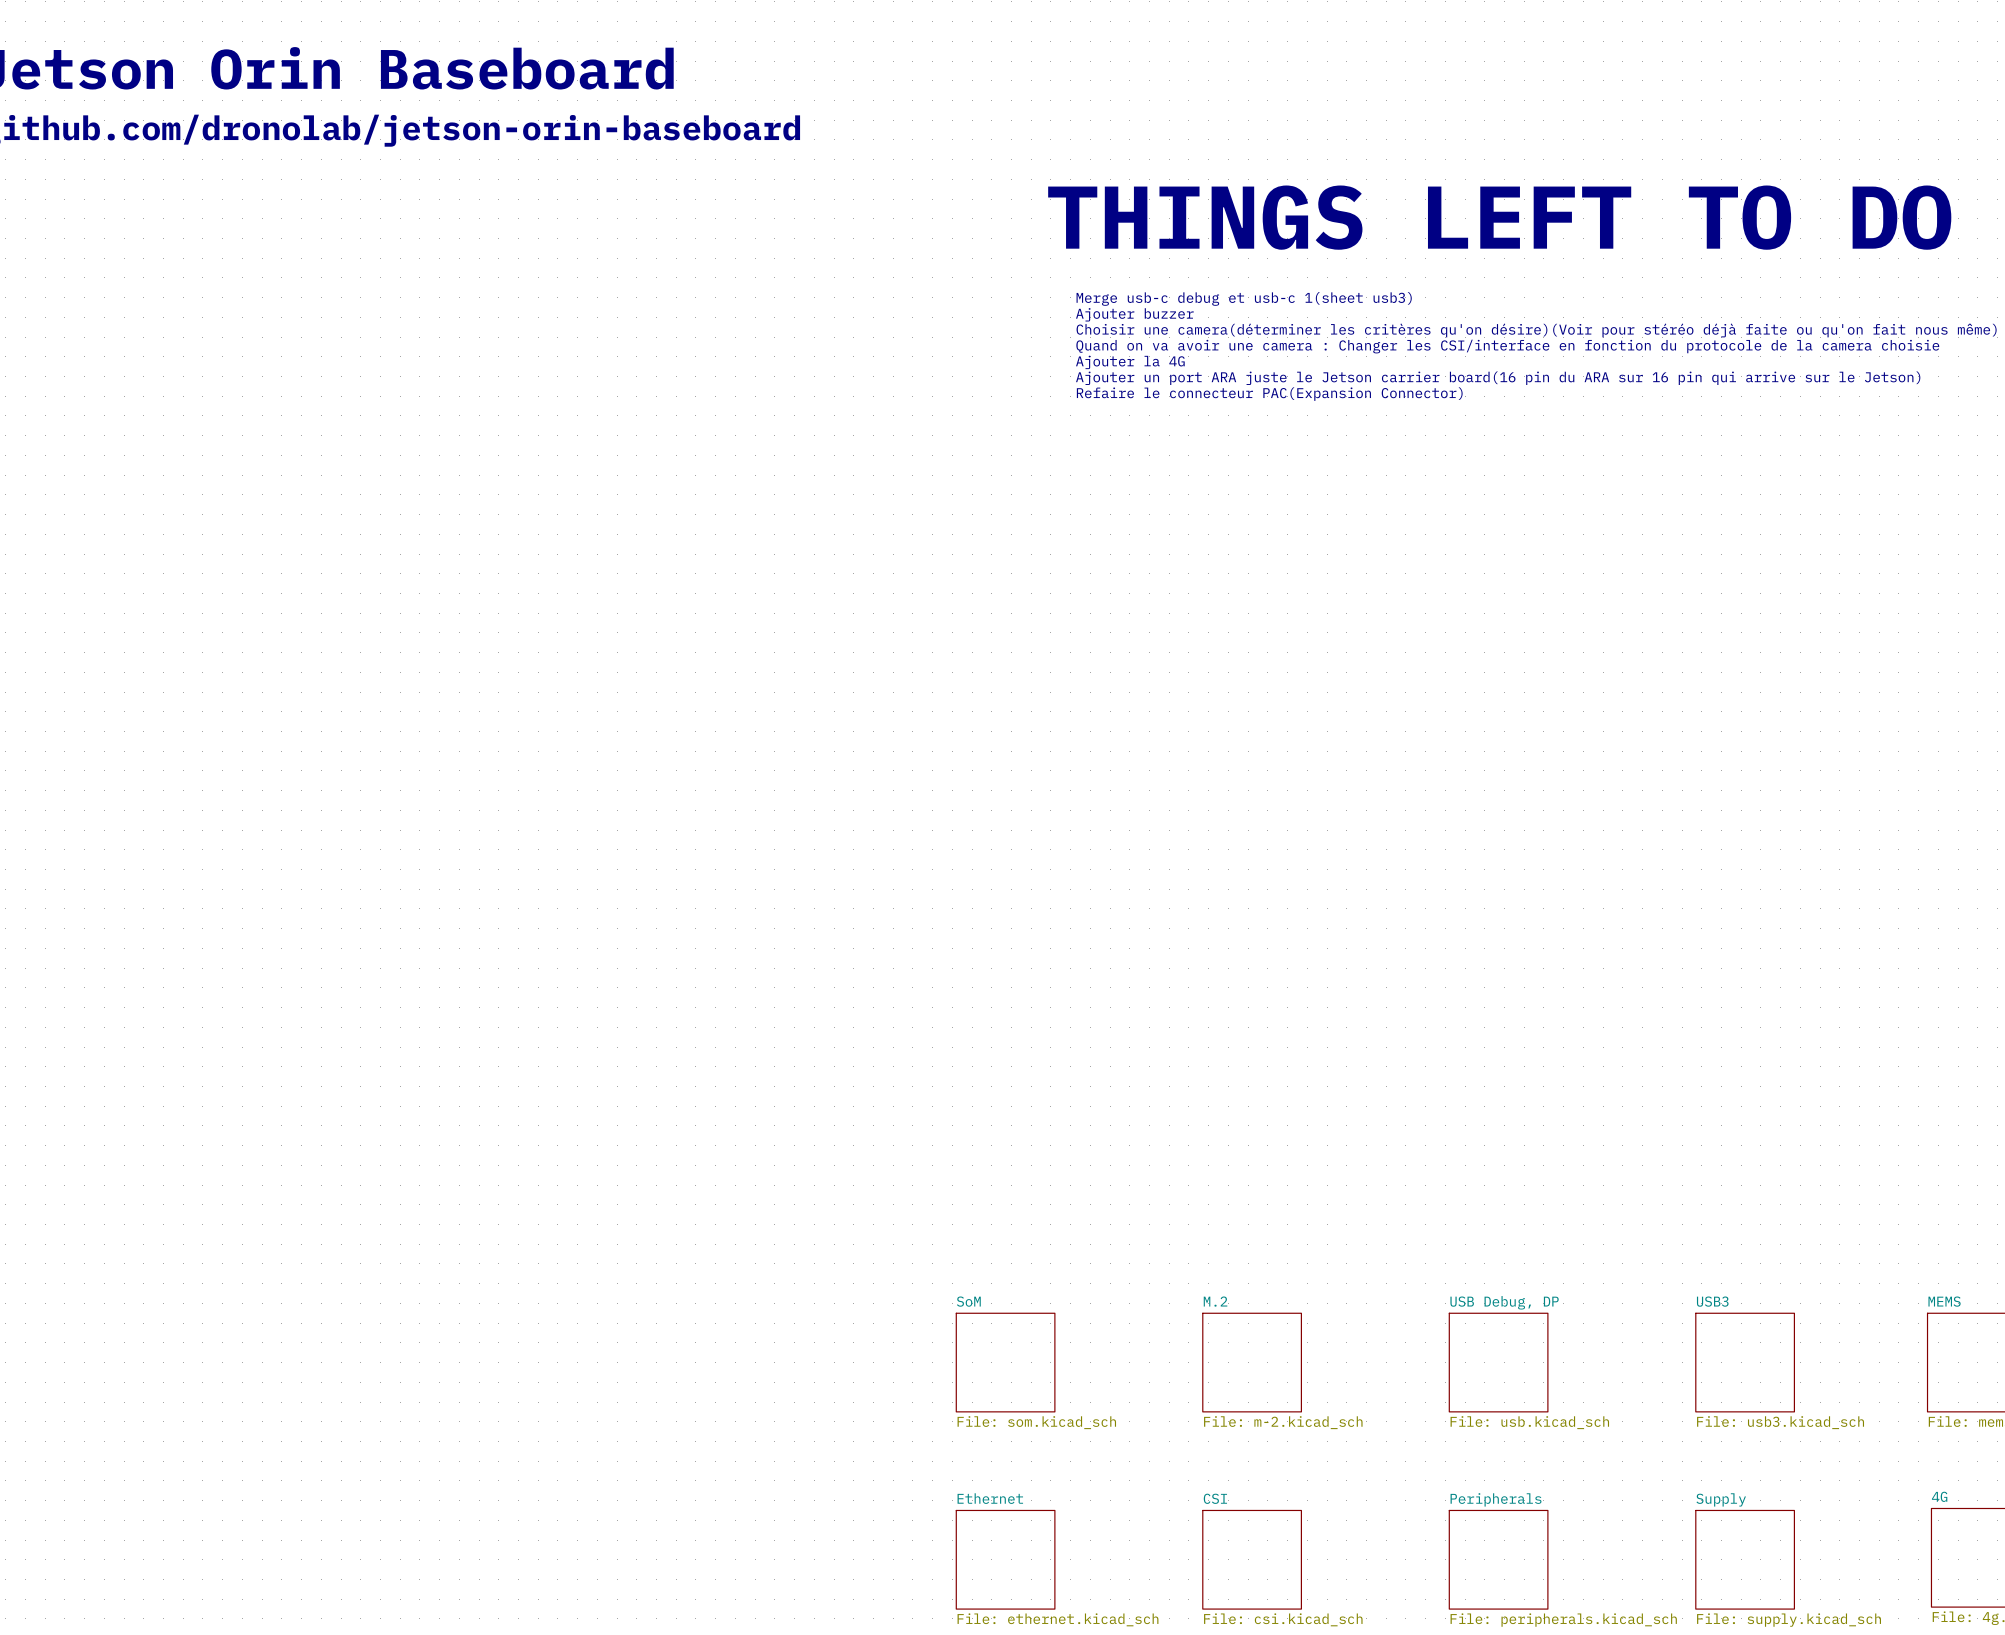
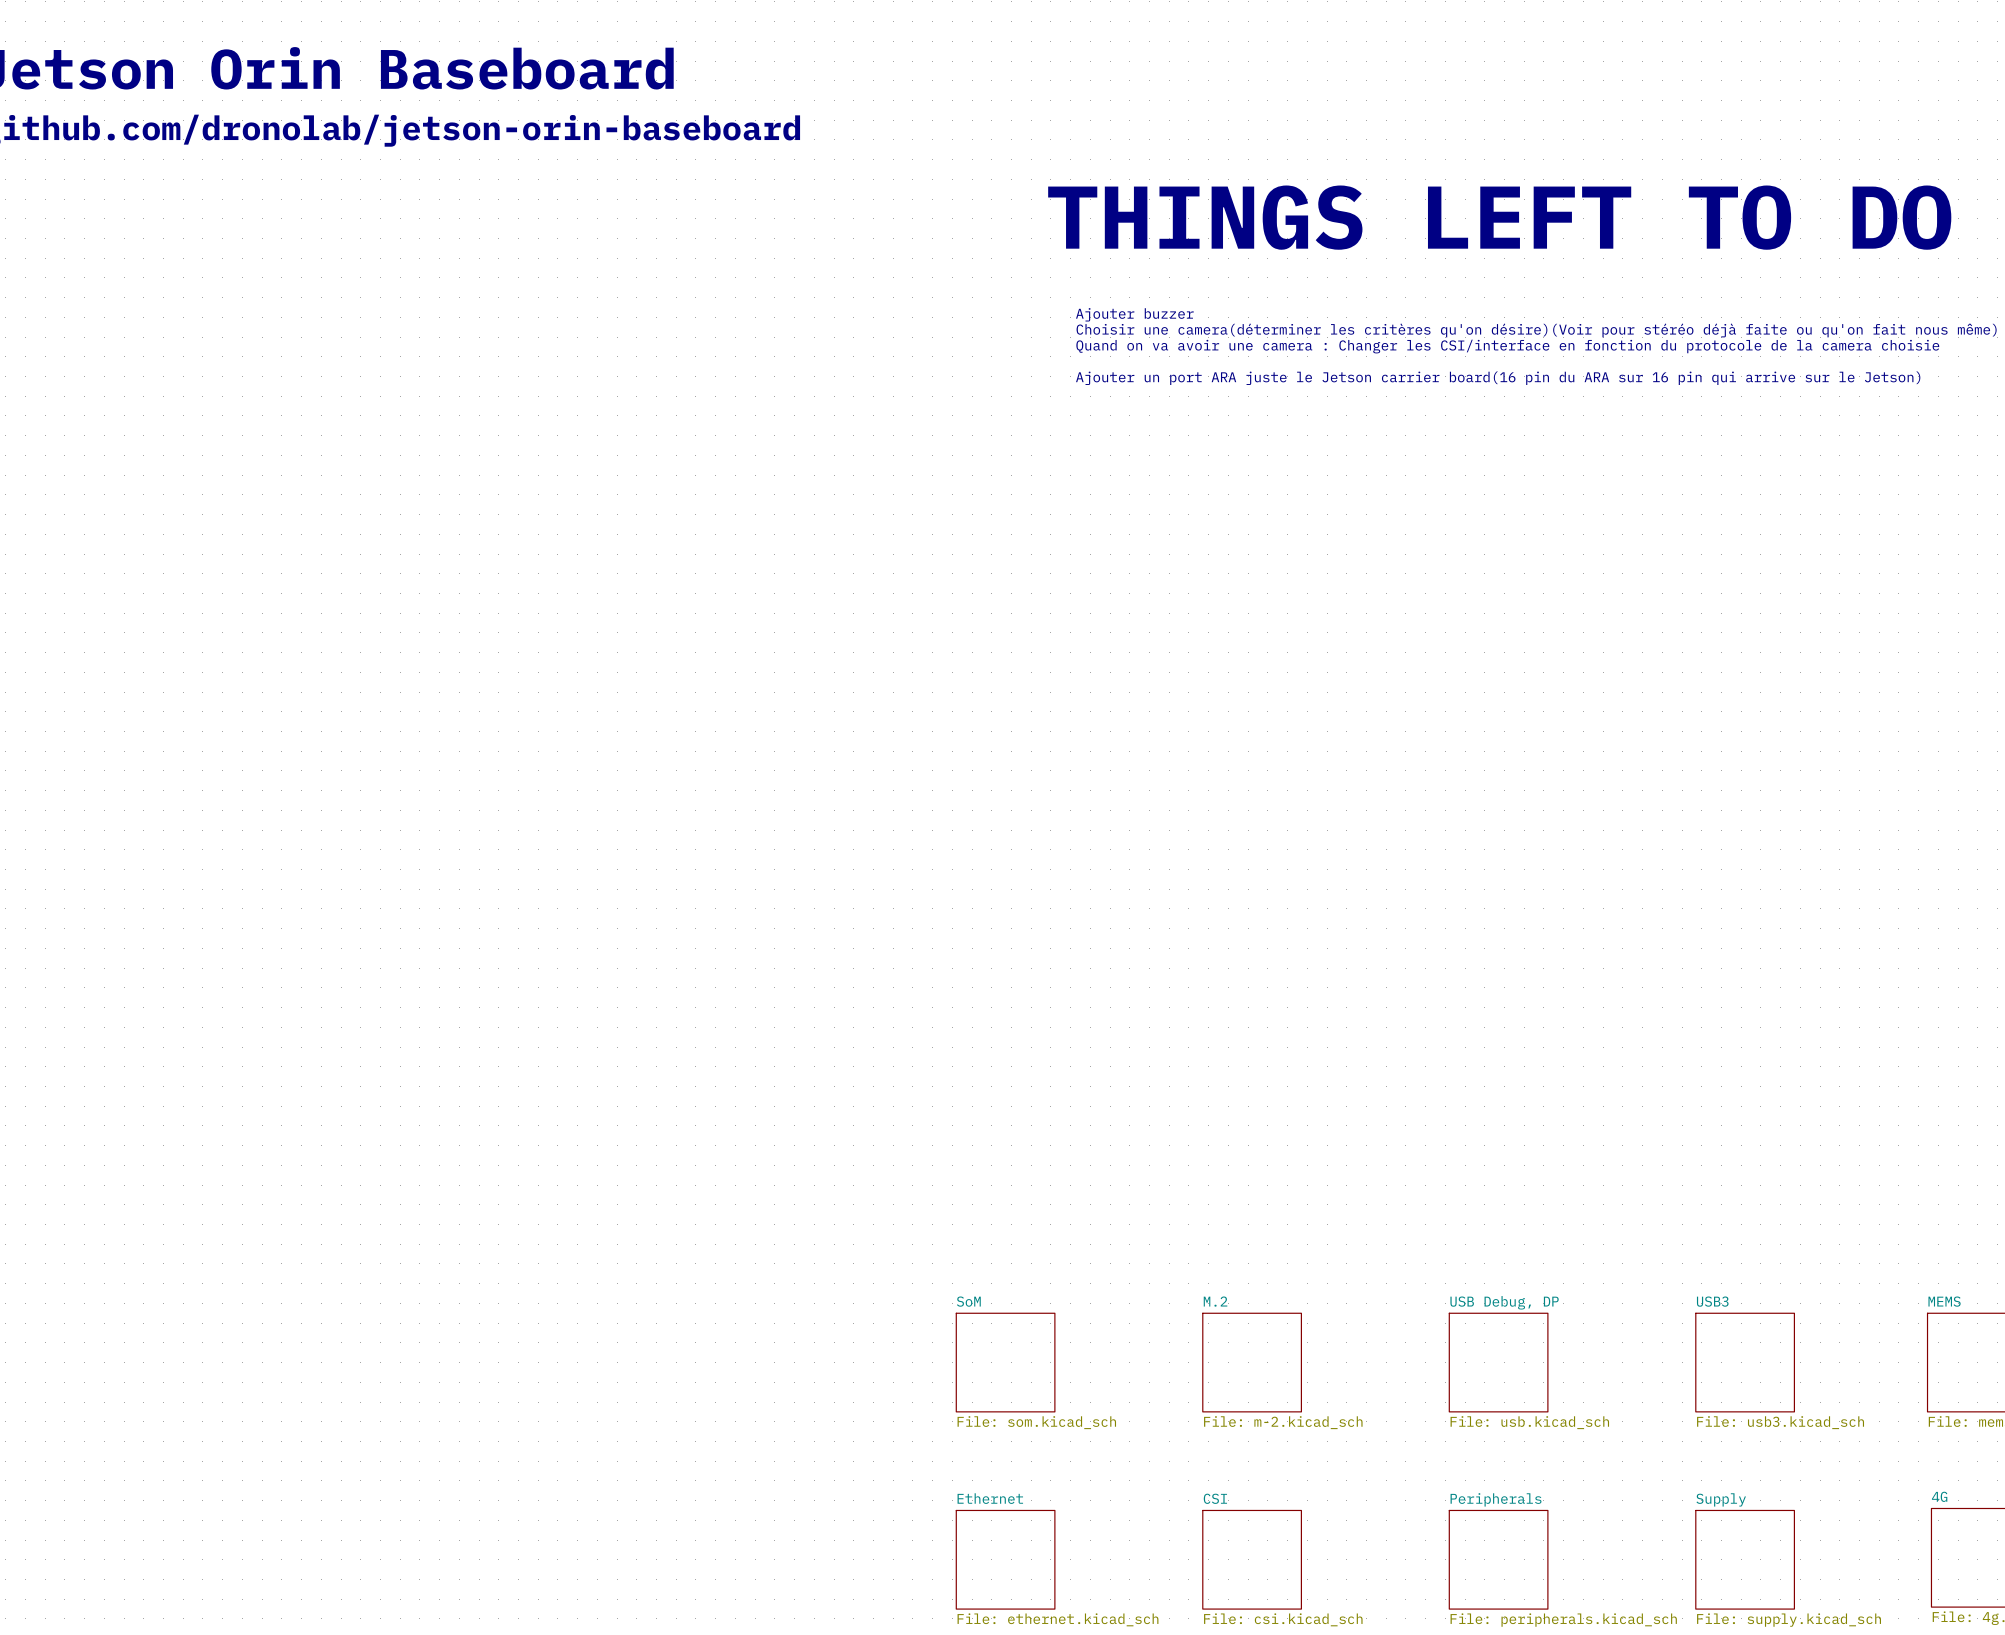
text: Merge usb-c debug et usb-c 1(sheet usb3) (1244, 298) -> none
text: Ajouter la 4G (1130, 362) -> none
text: Refaire le connecteur PAC(Expansion Connector) (1269, 394) -> none

